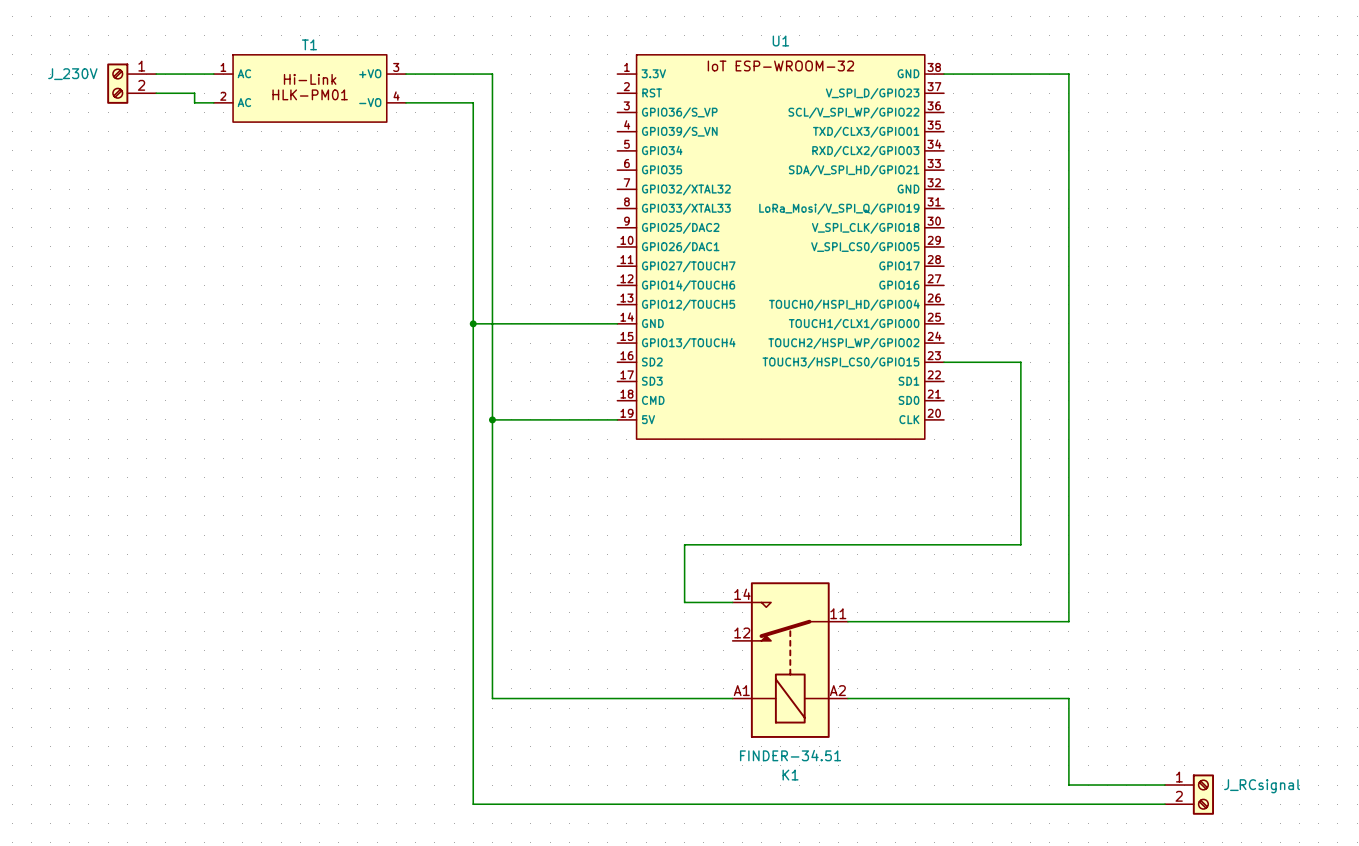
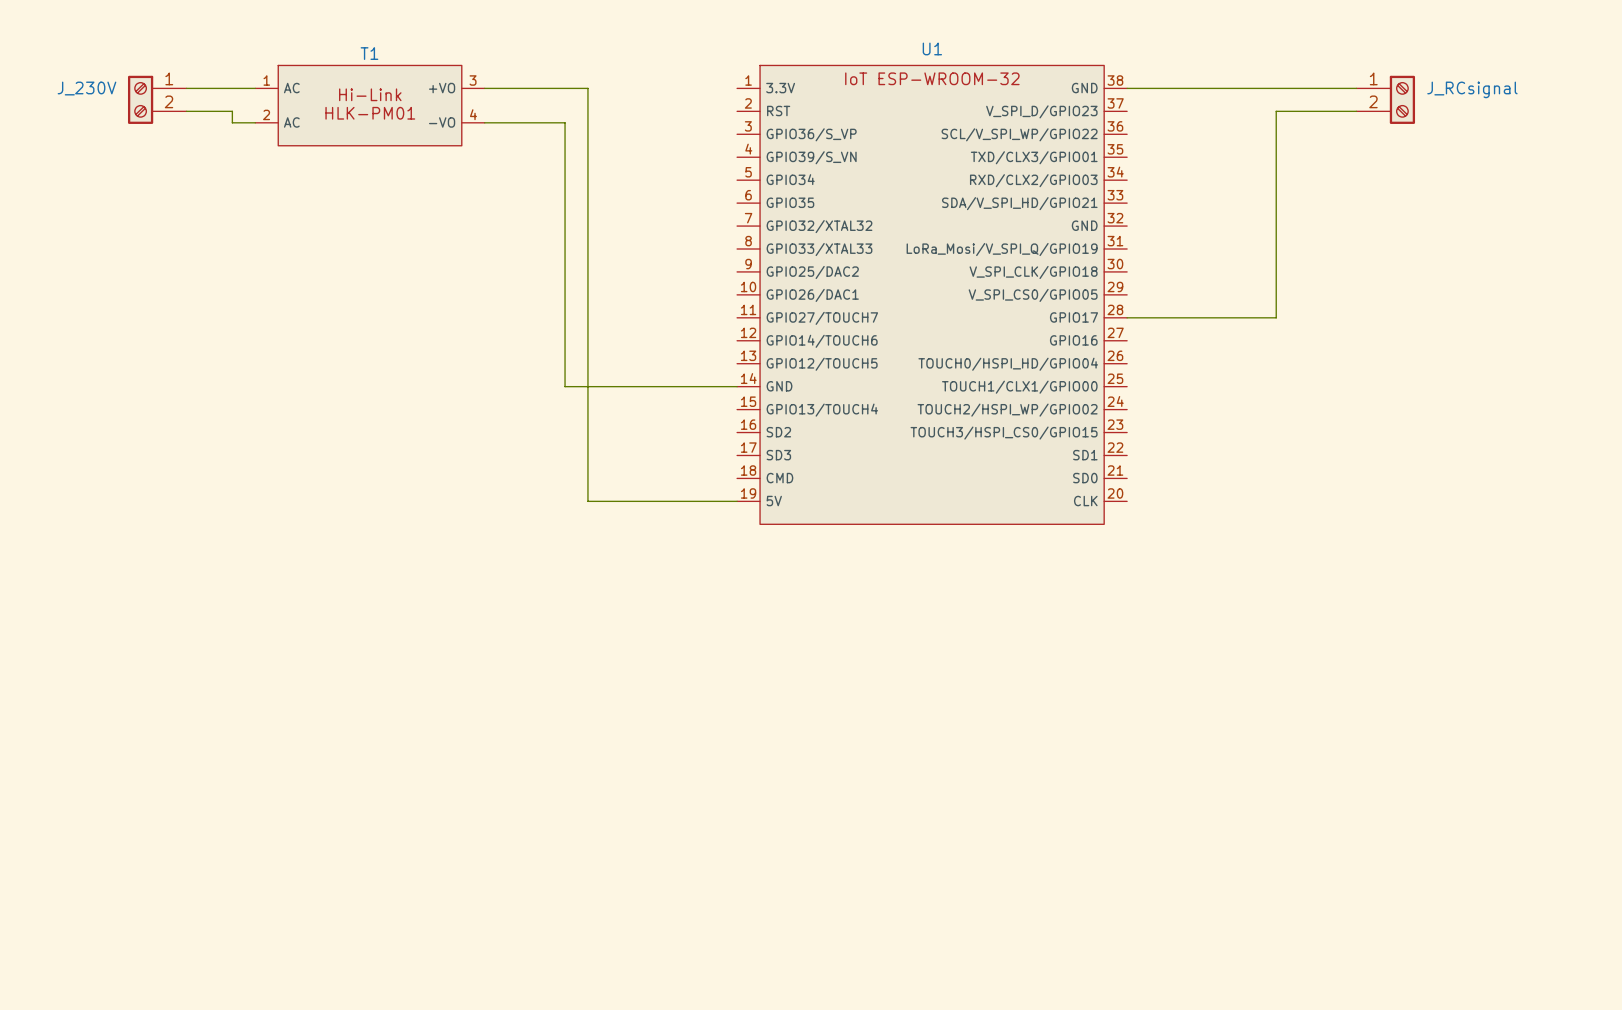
wire: (1068, 74) (1068, 93) -> (1276, 88) (1356, 88)
J_RCsignal: none -> (1385, 99)
wire: none -> (1276, 111) (1356, 111)
wire: (1068, 266) (1068, 621) (847, 621) -> (1276, 317) (1127, 317)
wire: (473, 323) (473, 804) (1164, 804) -> none
junction: (473, 323) -> none
wire: (944, 362) (1020, 362) (1020, 544) (684, 544) (684, 602) (732, 602) -> none
wire: (492, 419) (492, 698) (732, 698) -> none
junction: (492, 419) -> none
K1: FINDER-34.51 (790, 660) -> none
wire: (847, 698) (1068, 698) (1068, 785) (1164, 785) -> none
J_RCsignal: (1189, 794) -> none

